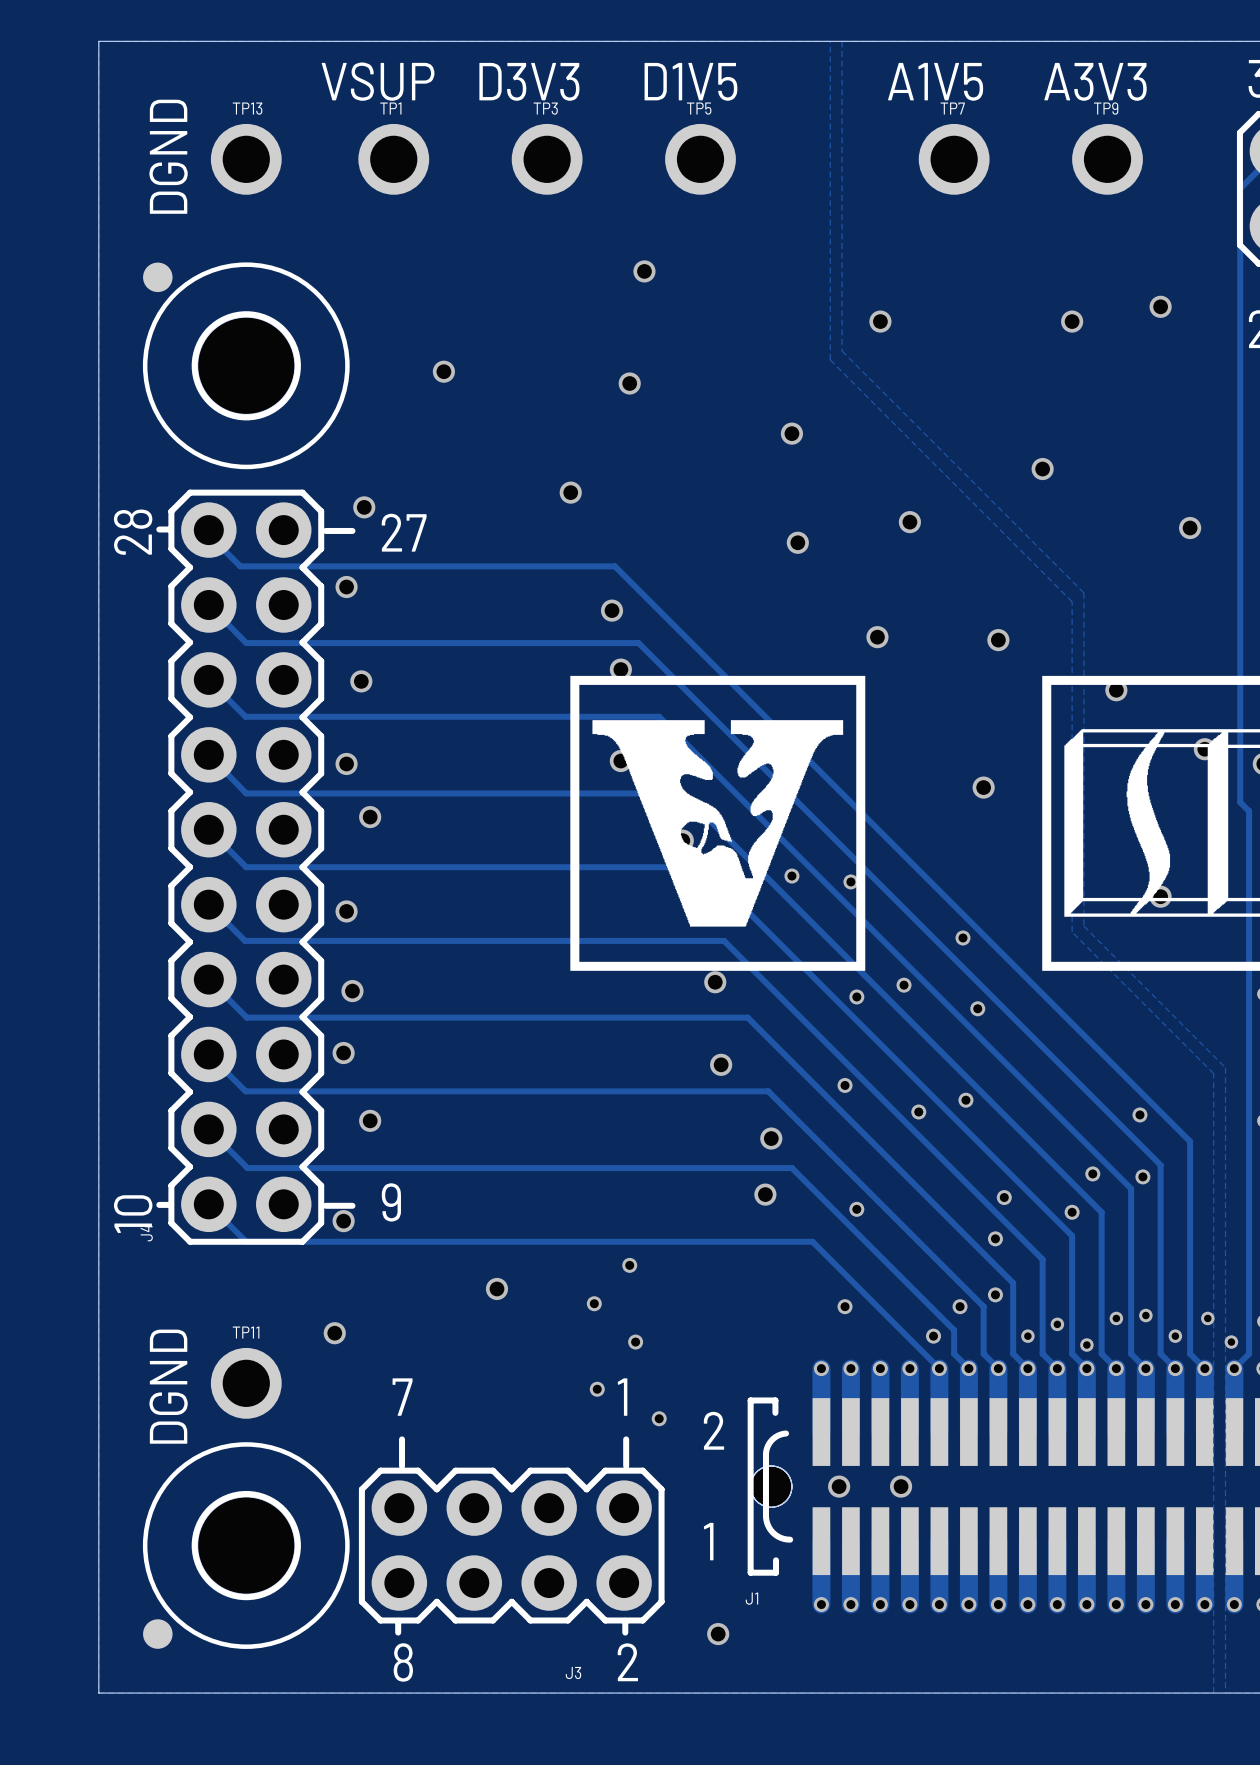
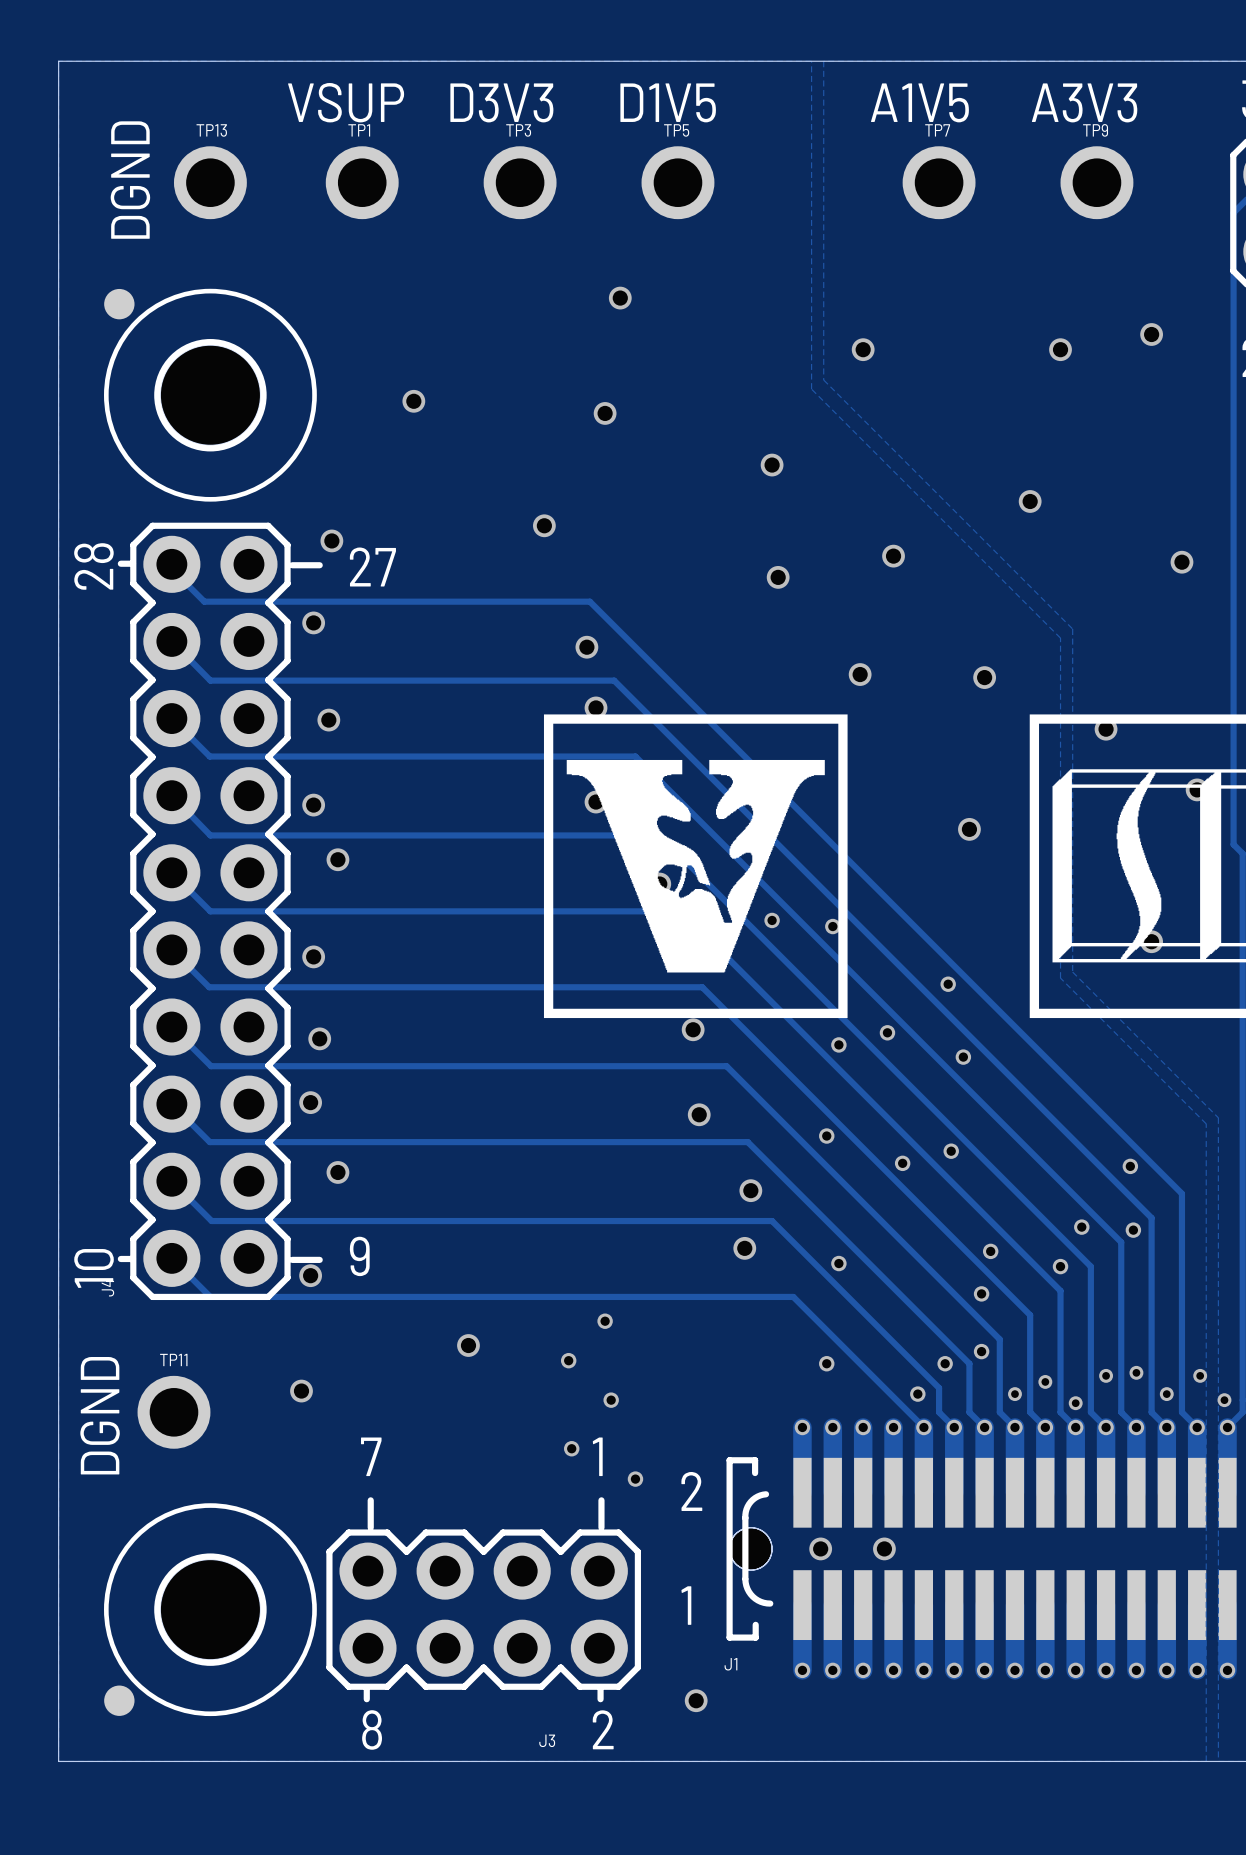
TP11 position: (246, 1383) -> (173, 1412)
text position: DGND (168, 1386) -> DGND (100, 1415)

